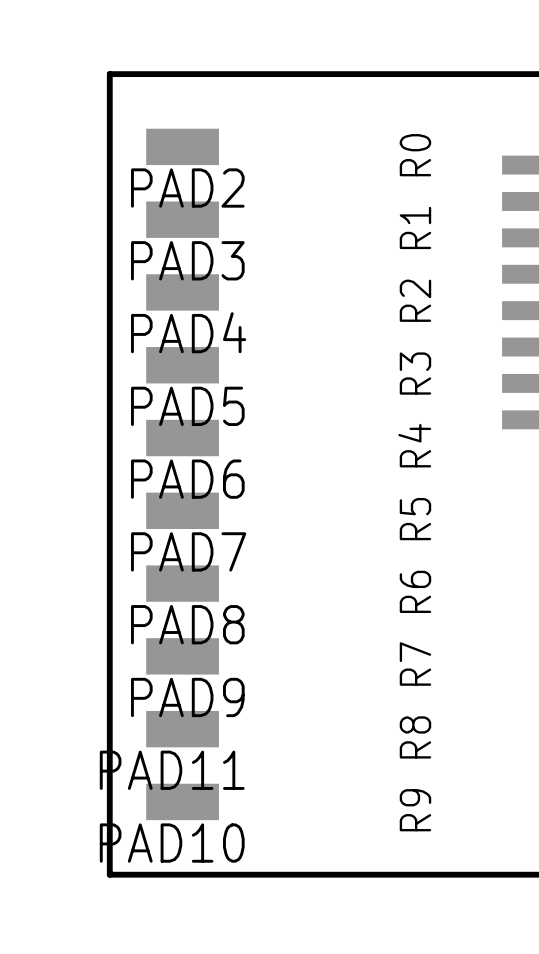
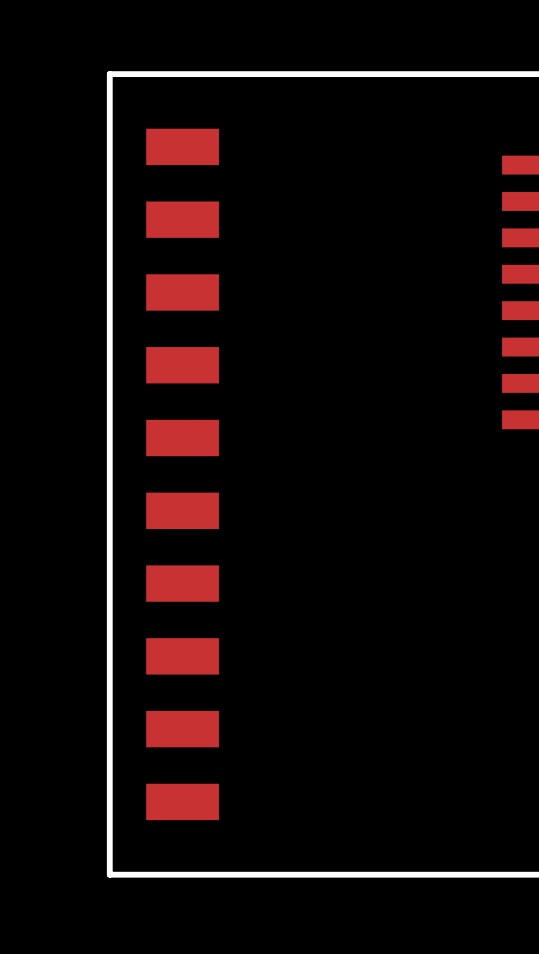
text: R0 (415, 155) -> none
PAD2 name: PAD2 (187, 188) -> none
text: R1 (415, 227) -> none
PAD3 name: PAD3 (187, 260) -> none
text: R2 (415, 300) -> none
PAD4 name: PAD4 (188, 332) -> none
text: R3 (415, 373) -> none
PAD5 name: PAD5 (187, 406) -> none
text: R4 (414, 445) -> none
PAD6 name: PAD6 (187, 479) -> none
text: R5 (415, 519) -> none
PAD7 name: PAD7 (188, 551) -> none
text: R6 (415, 591) -> none
PAD8 name: PAD8 (187, 624) -> none
text: R7 (415, 664) -> none
PAD9 name: PAD9 (187, 697) -> none
text: R8 (415, 737) -> none
PAD11 name: PAD11 (172, 770) -> none
text: R9 (415, 810) -> none
PAD10 name: PAD10 (172, 843) -> none

